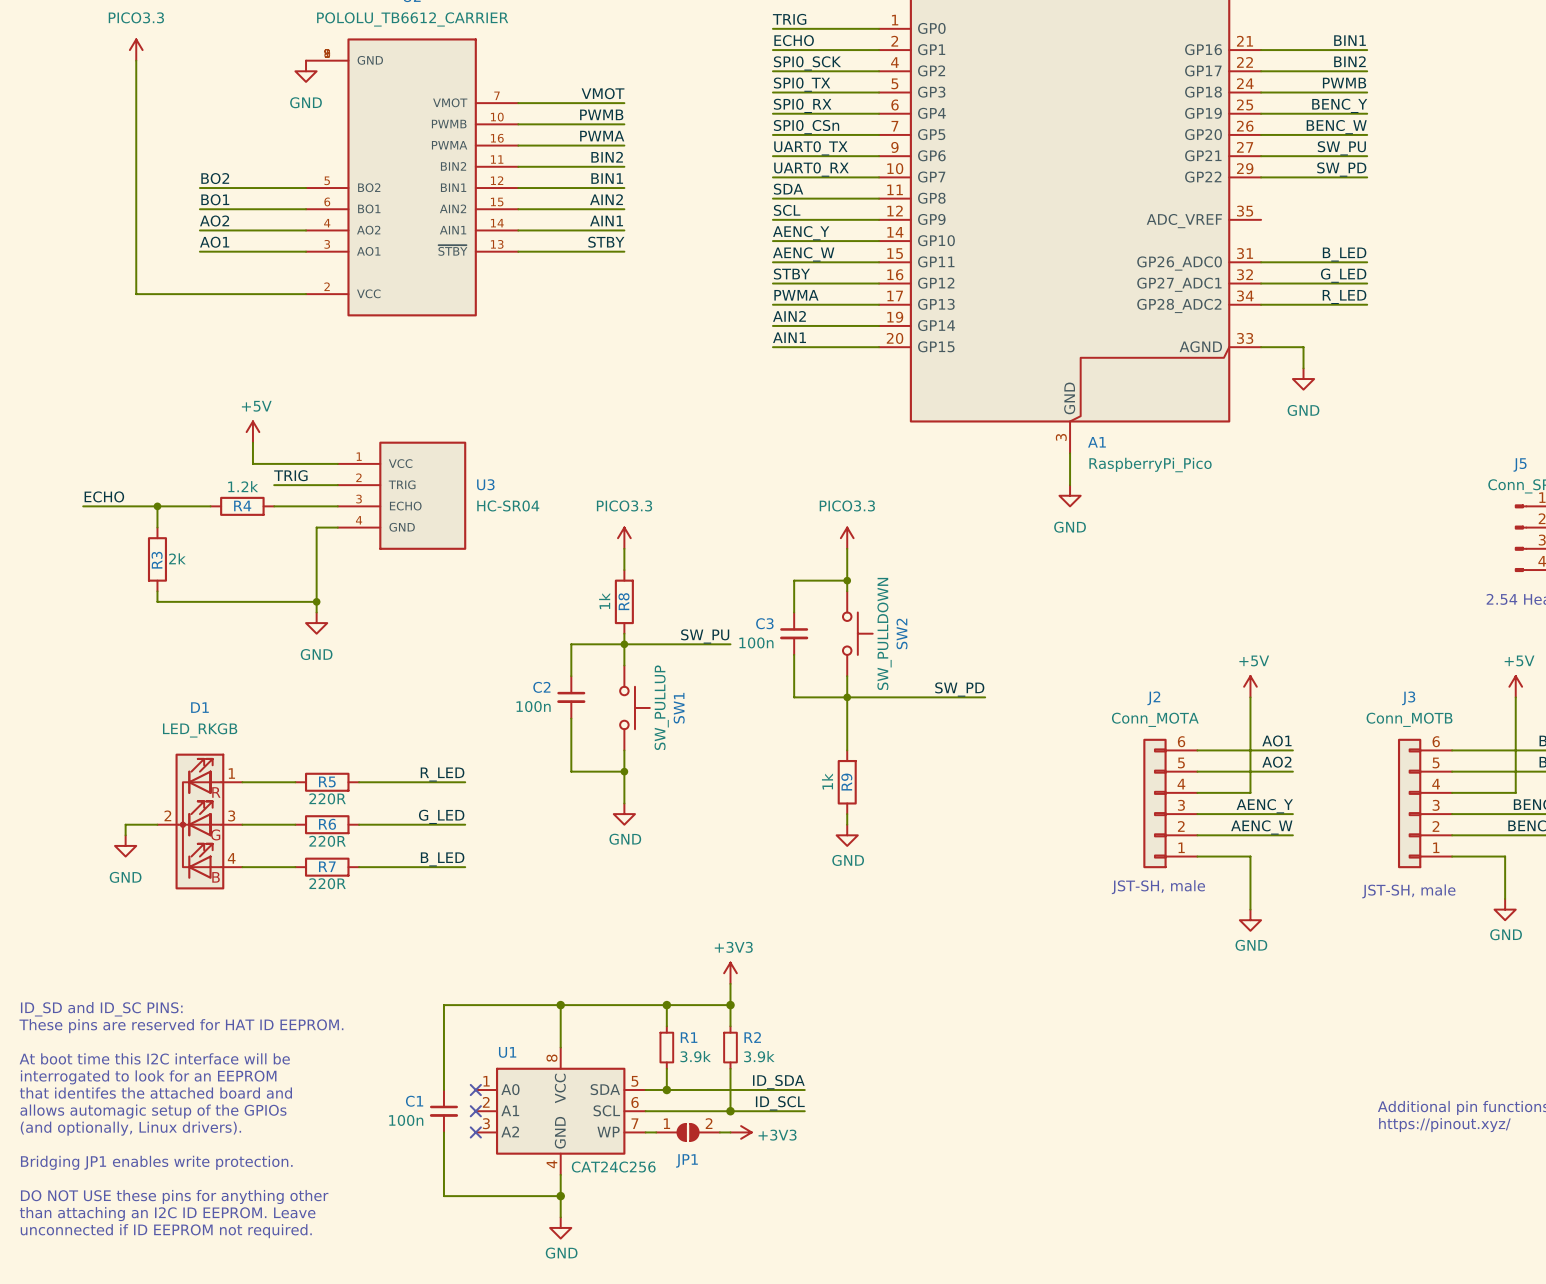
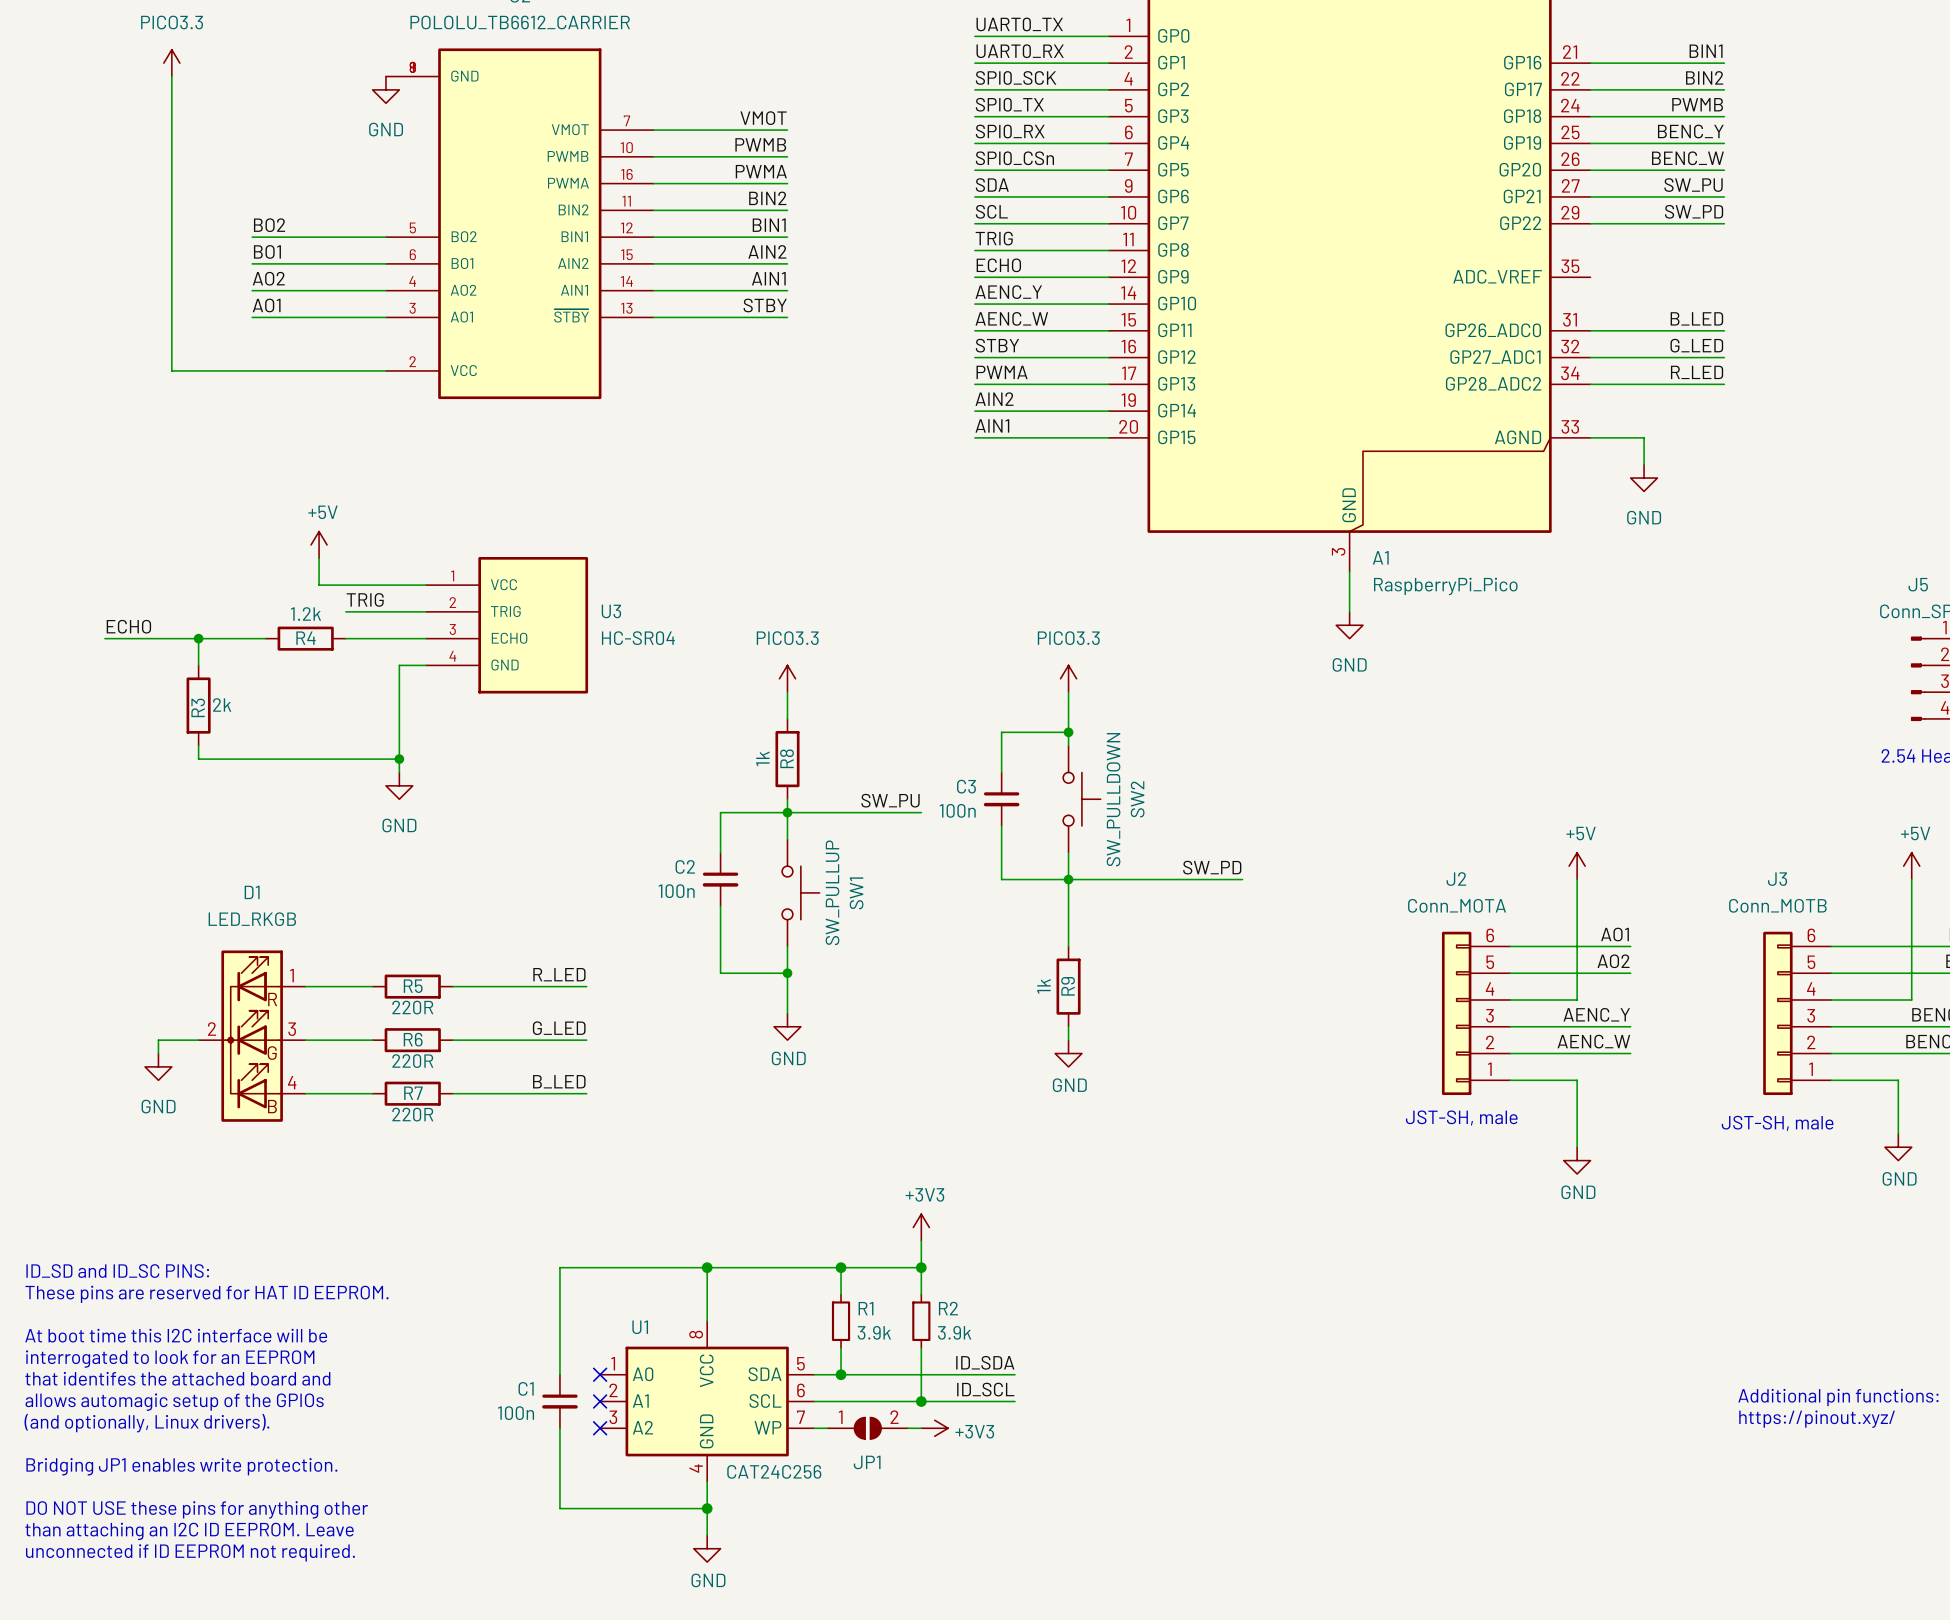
label: TRIG (789, 19) -> UART0_TX (1019, 24)
label: ECHO (794, 40) -> UART0_RX (1020, 51)
label: UART0_TX (810, 148) -> SDA (992, 185)
label: UART0_RX (811, 169) -> SCL (991, 211)
label: SDA (788, 189) -> TRIG (994, 238)
label: SCL (787, 210) -> ECHO (998, 265)

